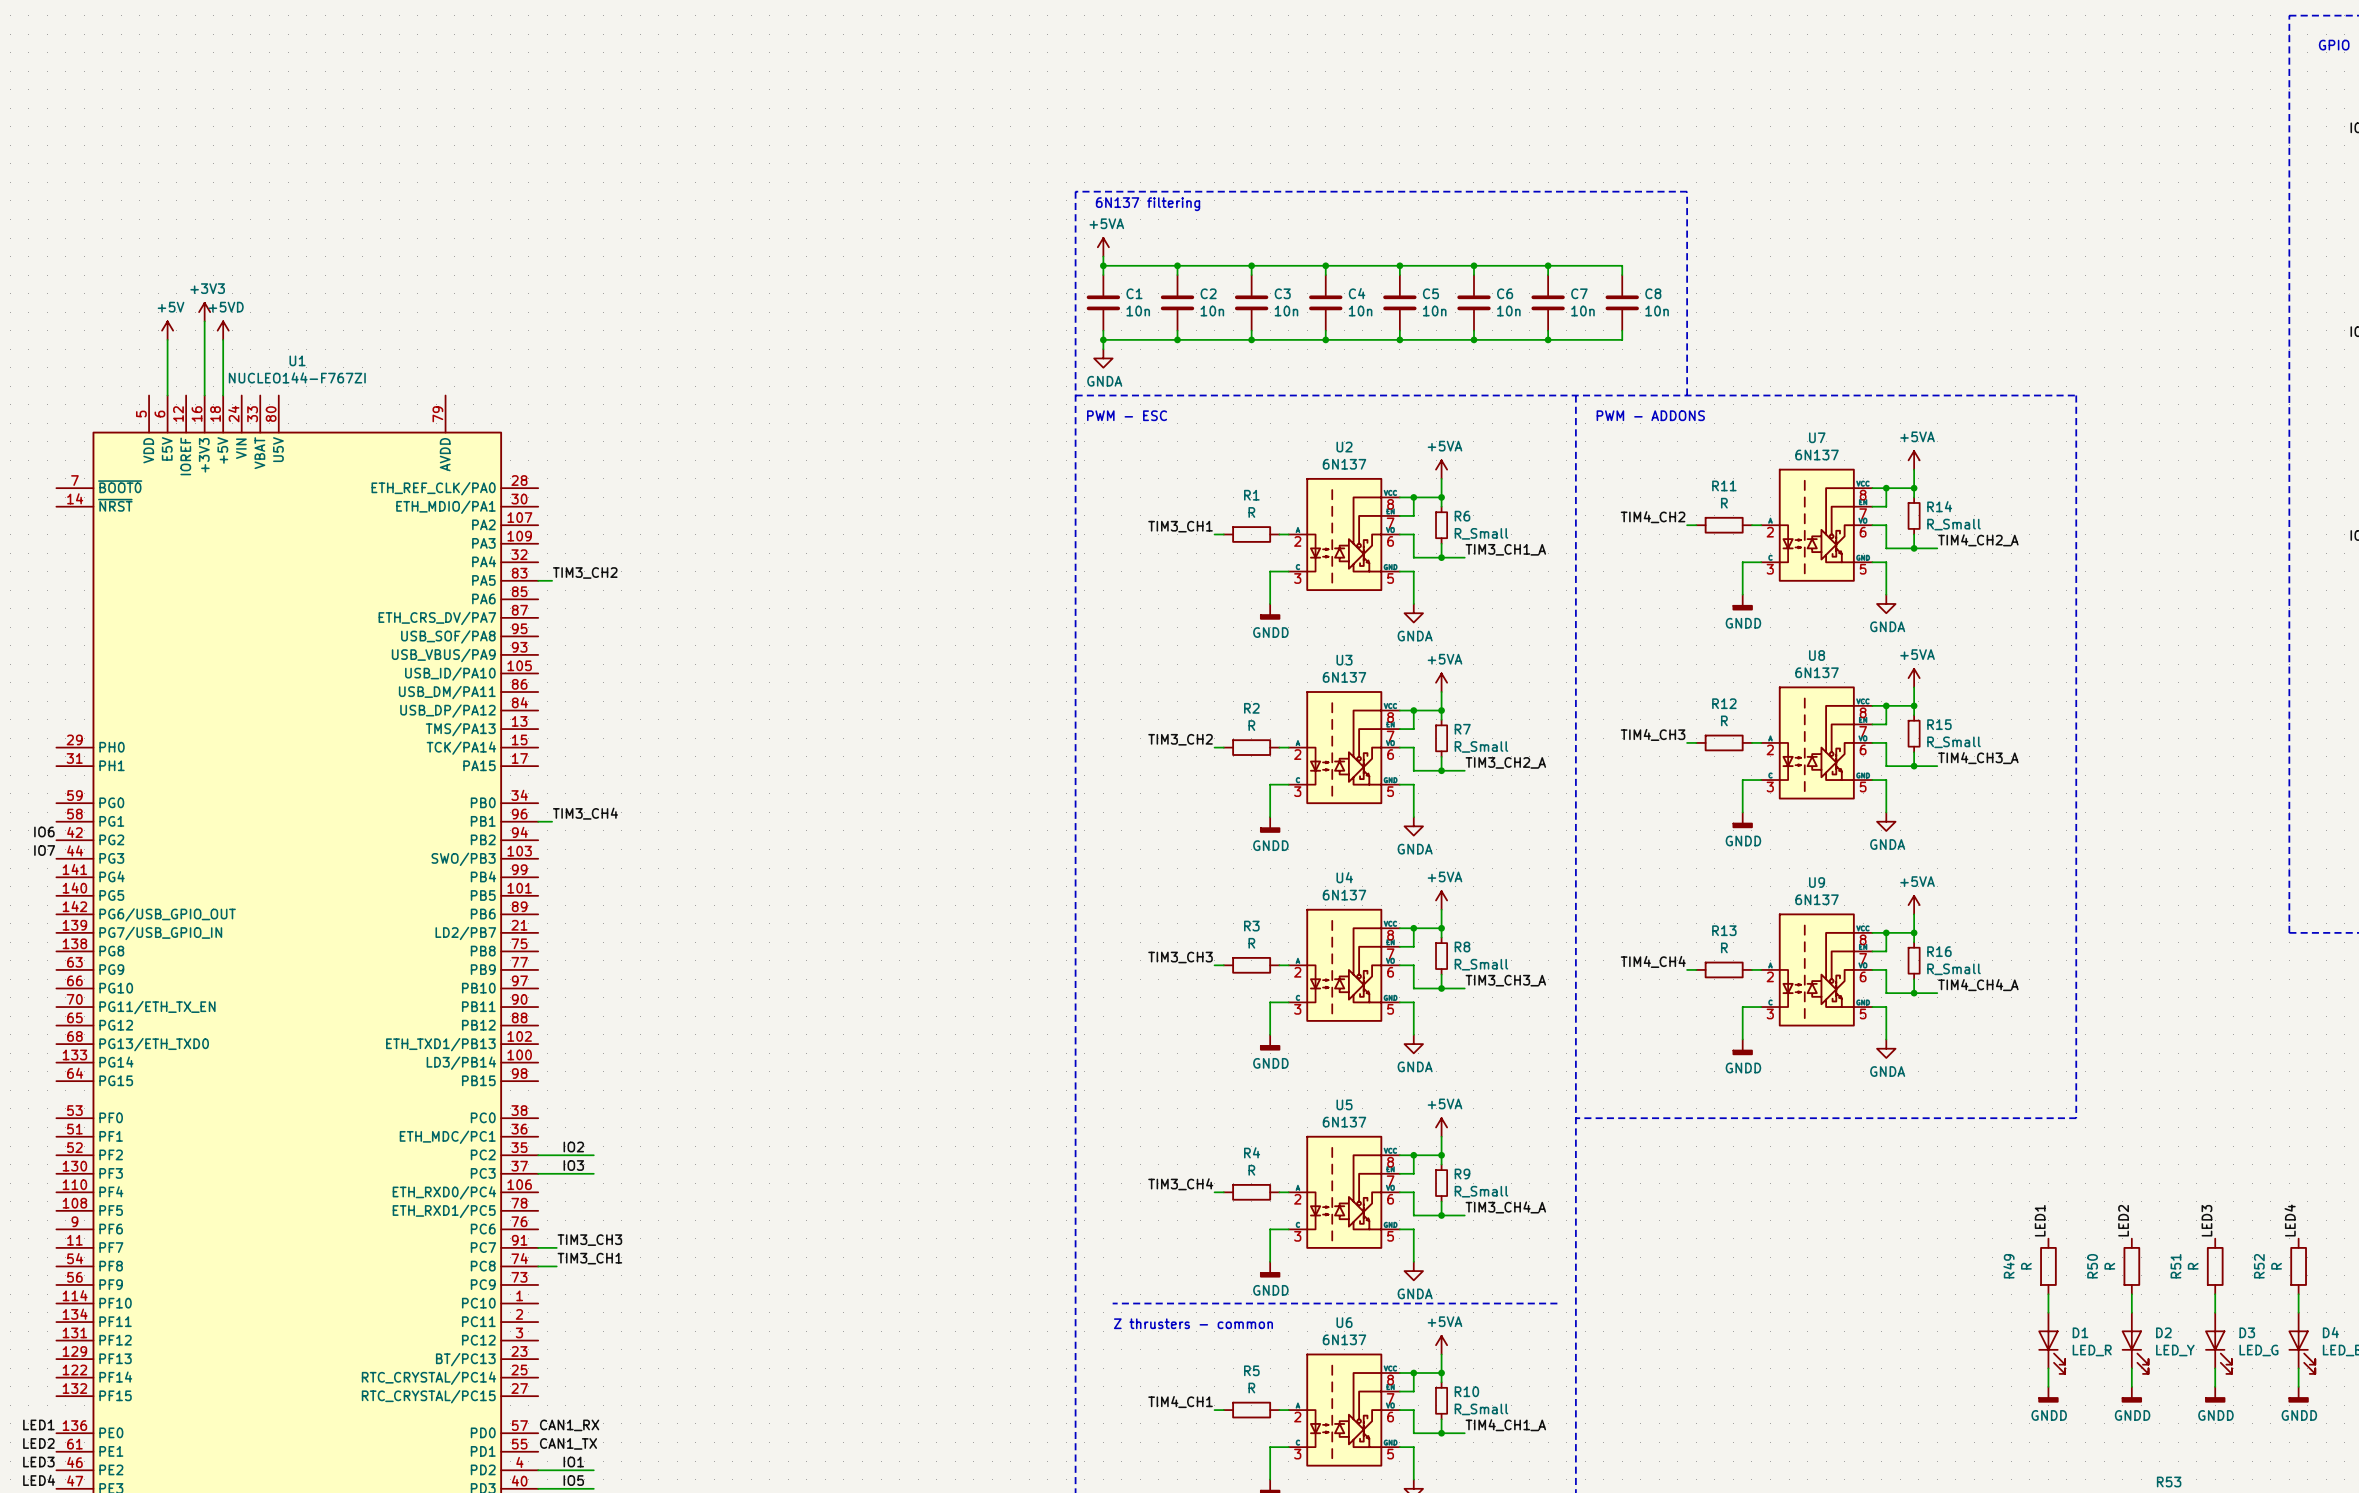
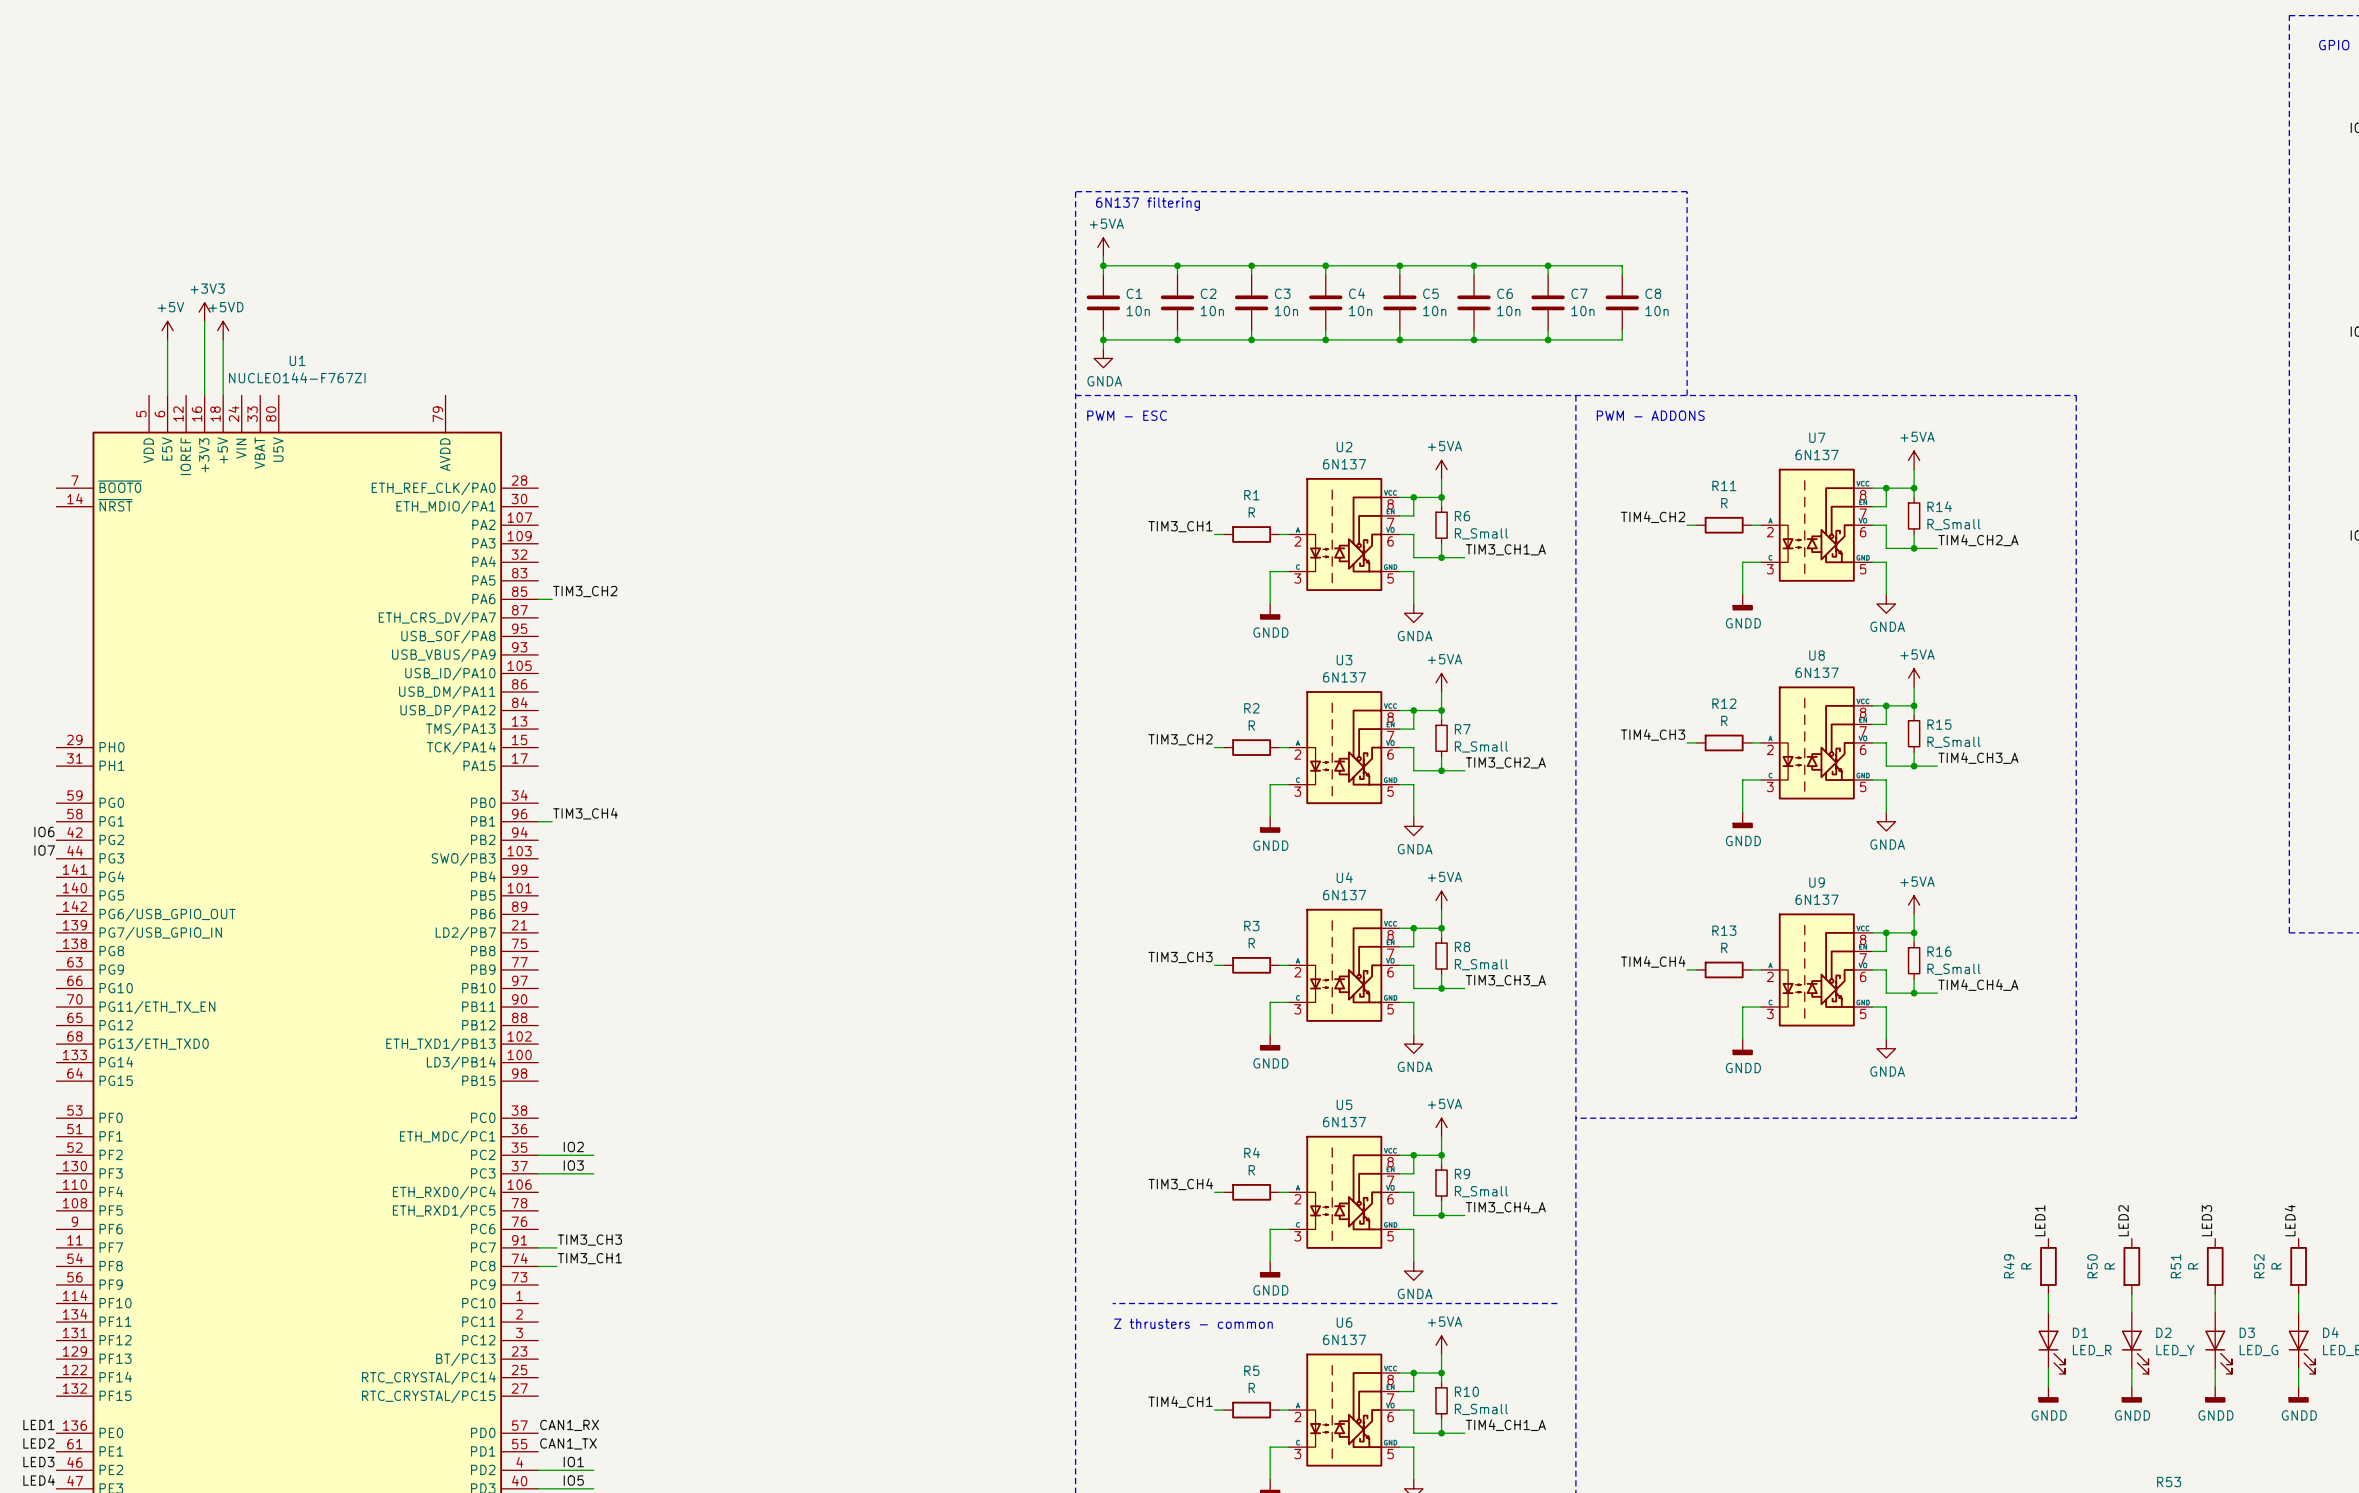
label position: TIM3_CH2 (585, 572) -> TIM3_CH2 (585, 591)
wire: (538, 580) (552, 580) -> (538, 599) (552, 599)

